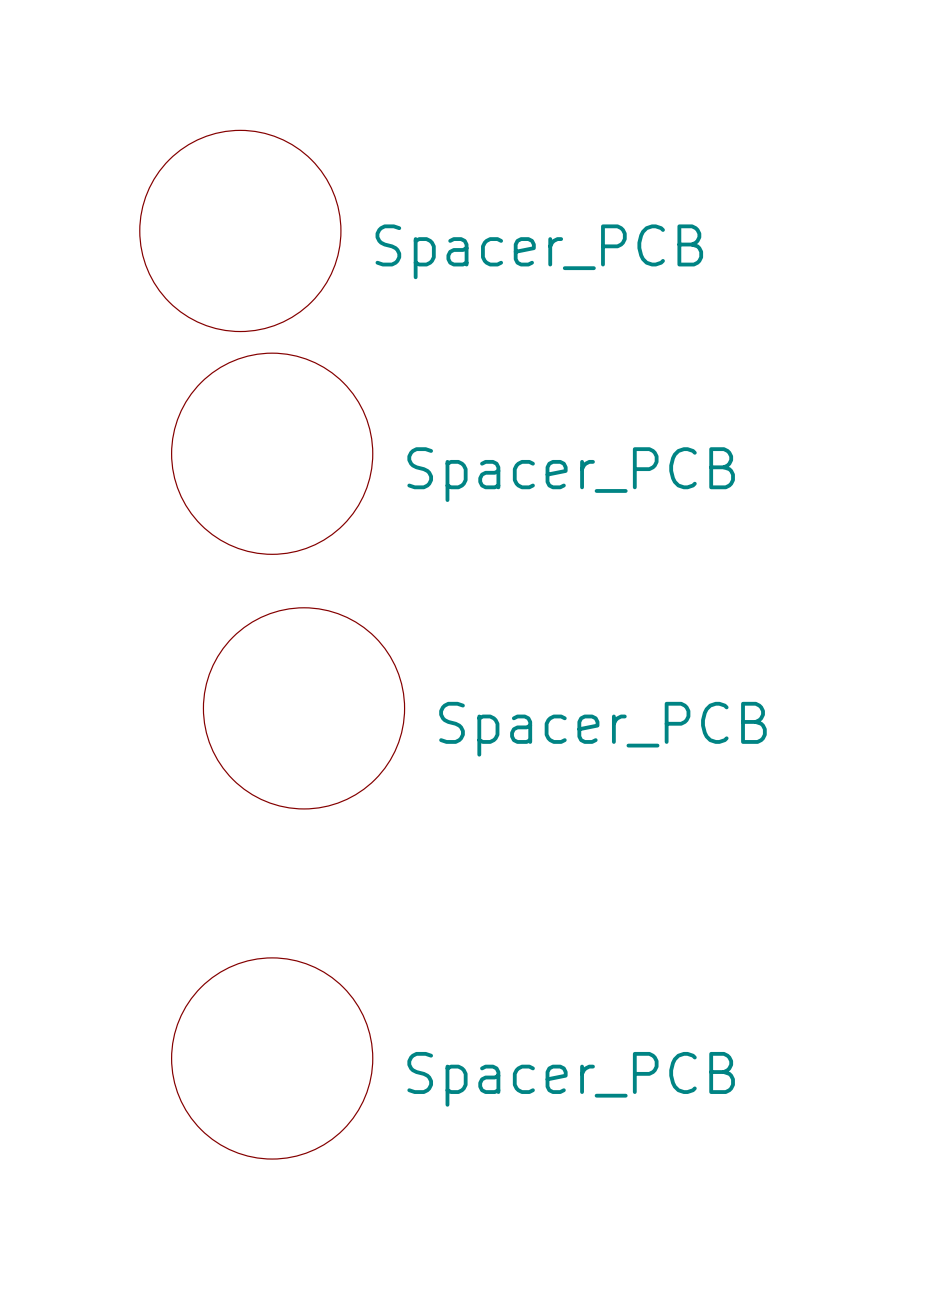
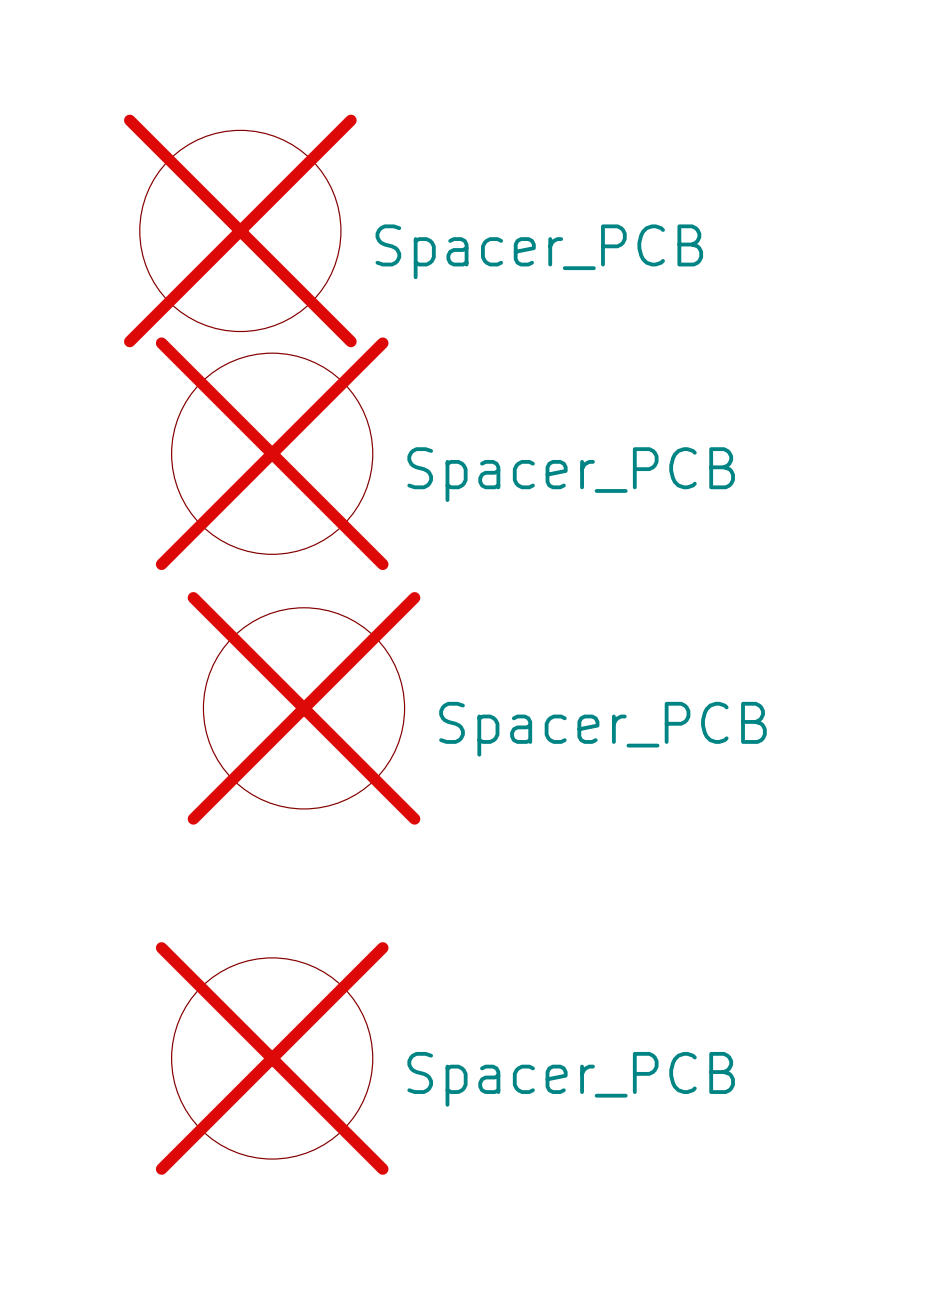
part do-not-place cross: none -> (240, 230)
part do-not-place cross: none -> (272, 453)
part do-not-place cross: none -> (304, 708)
part do-not-place cross: none -> (272, 1058)

